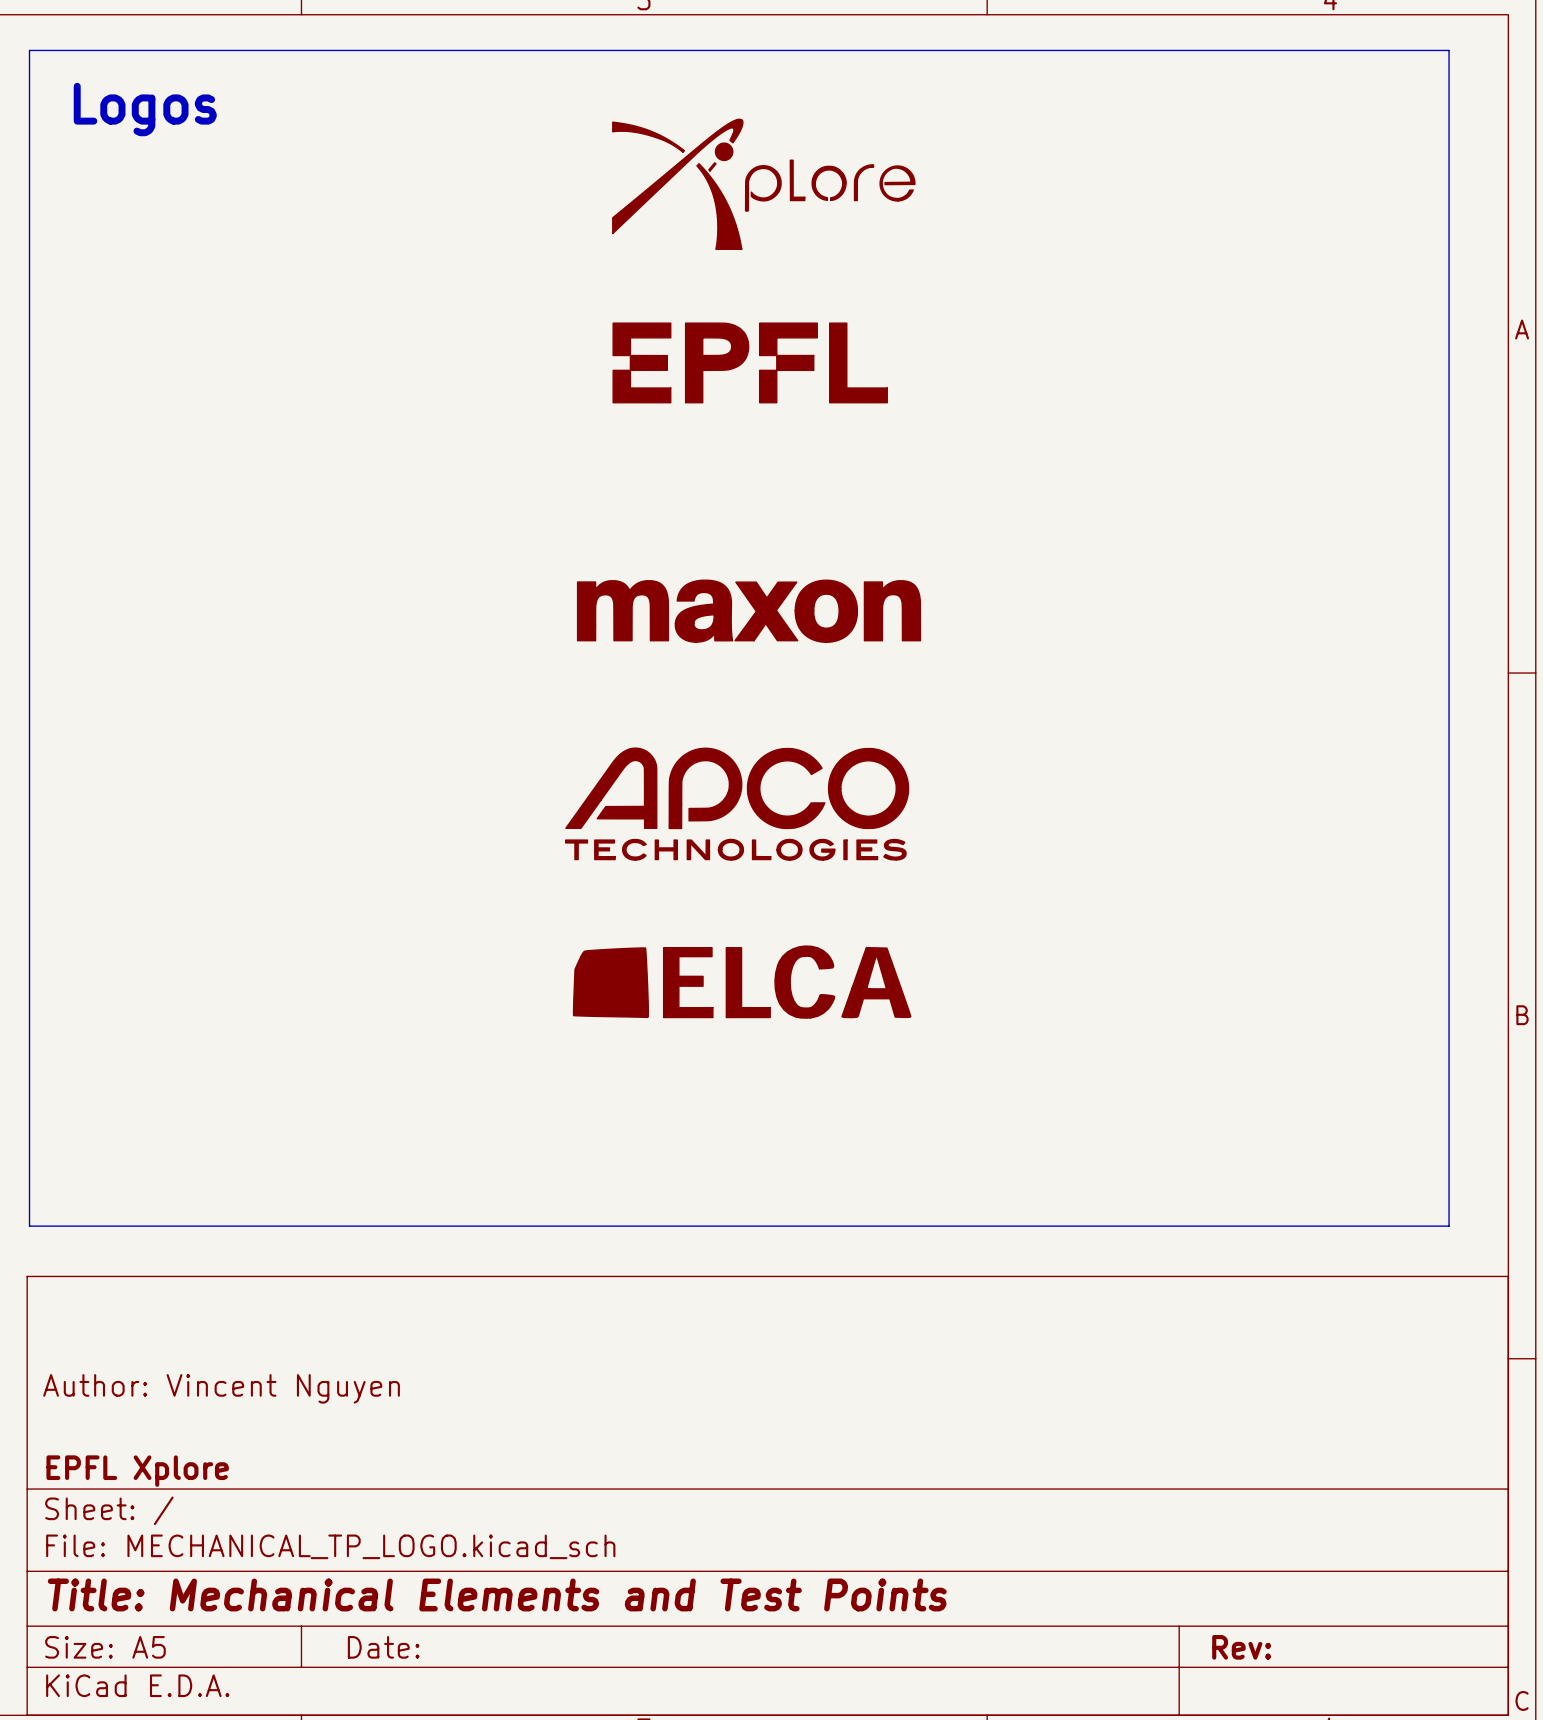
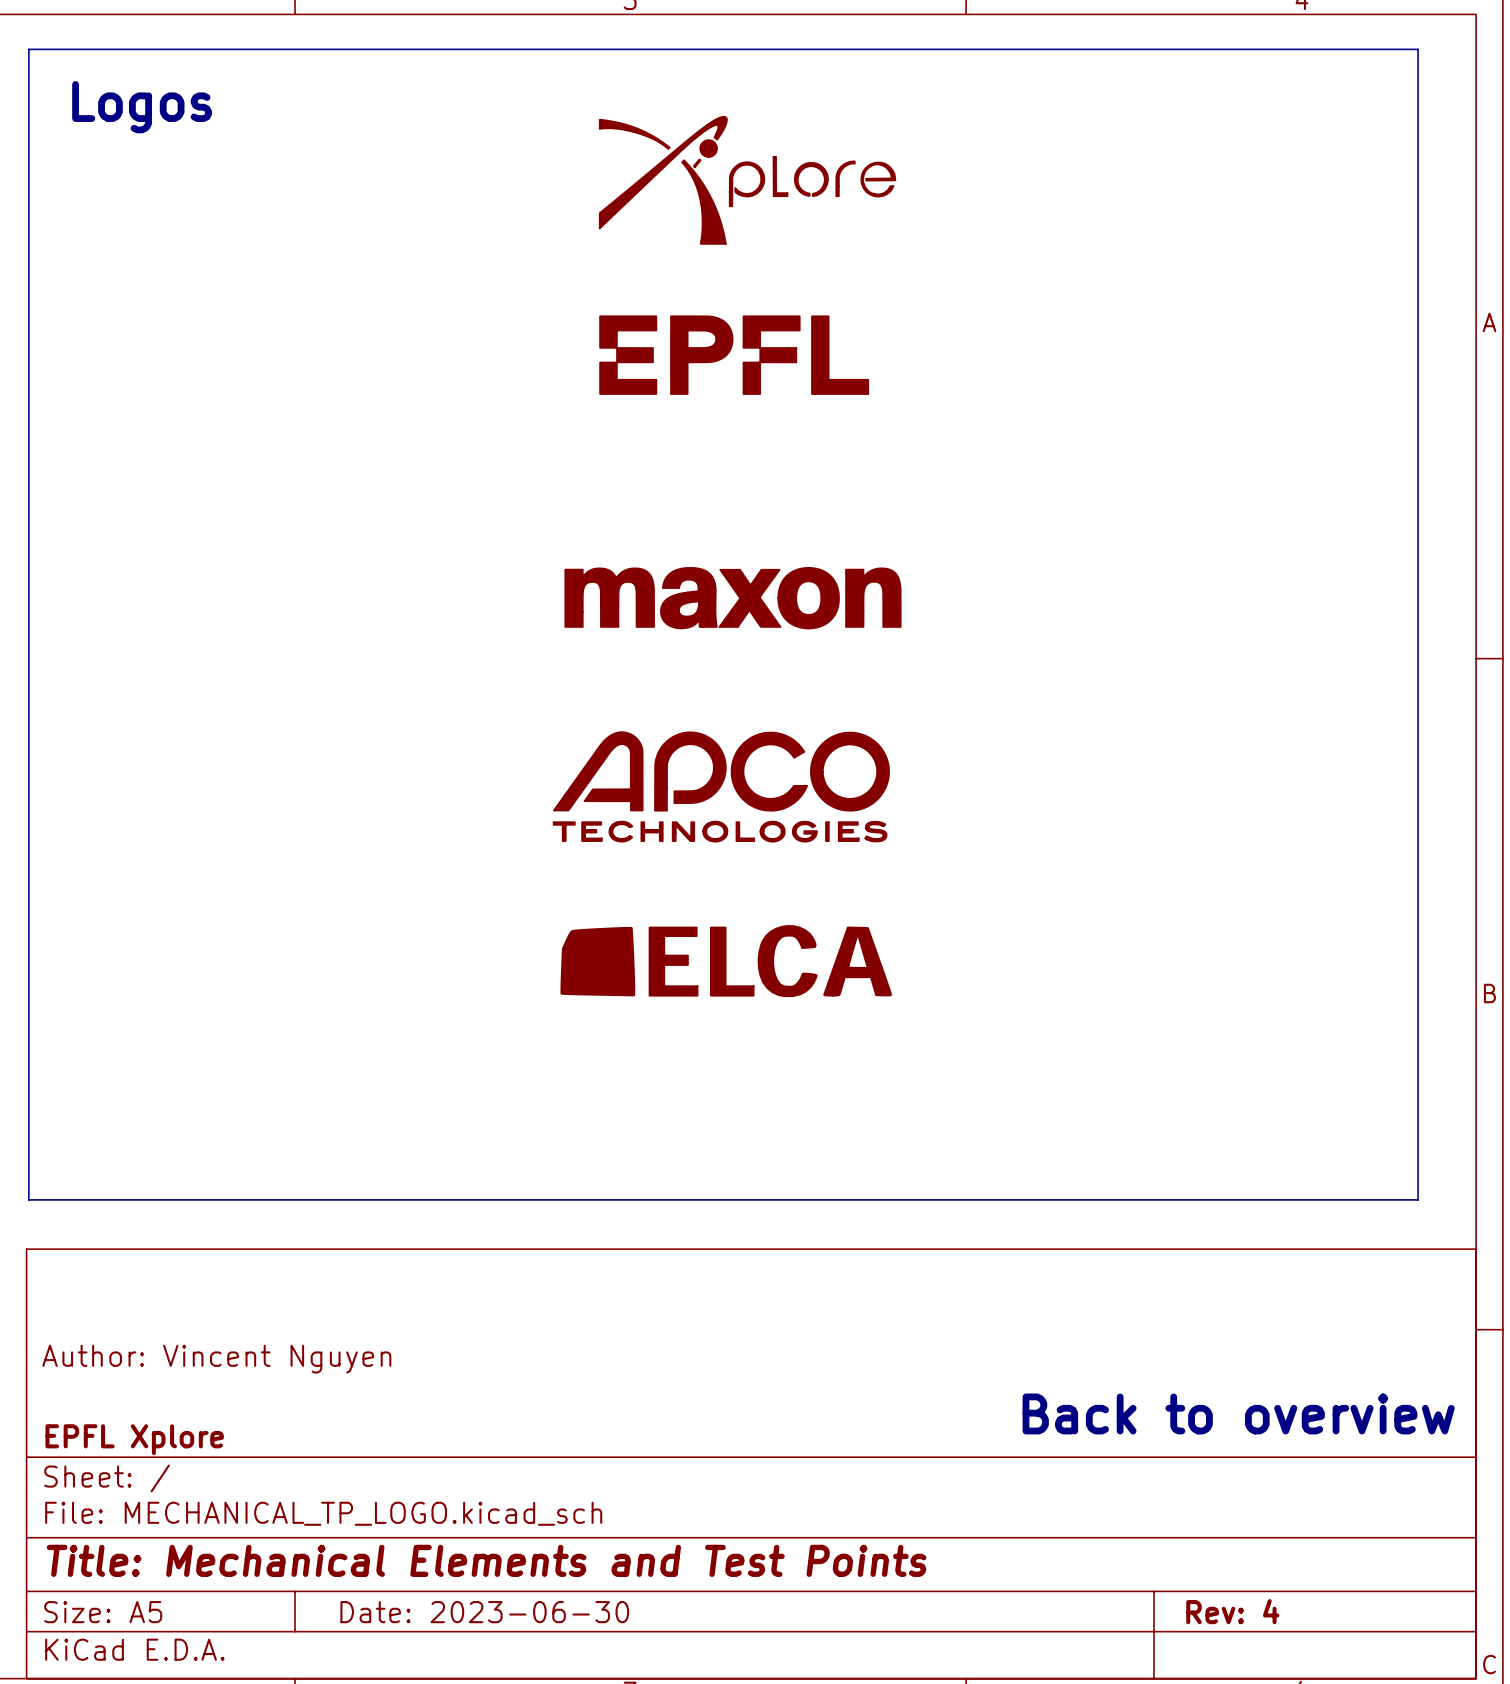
text: none -> Back to overview (1238, 1413)
title block: Date: (383, 1647) -> Date: 2023-06-30 (484, 1612)
title block: Rev: (1241, 1647) -> Rev: 4 (1232, 1611)

